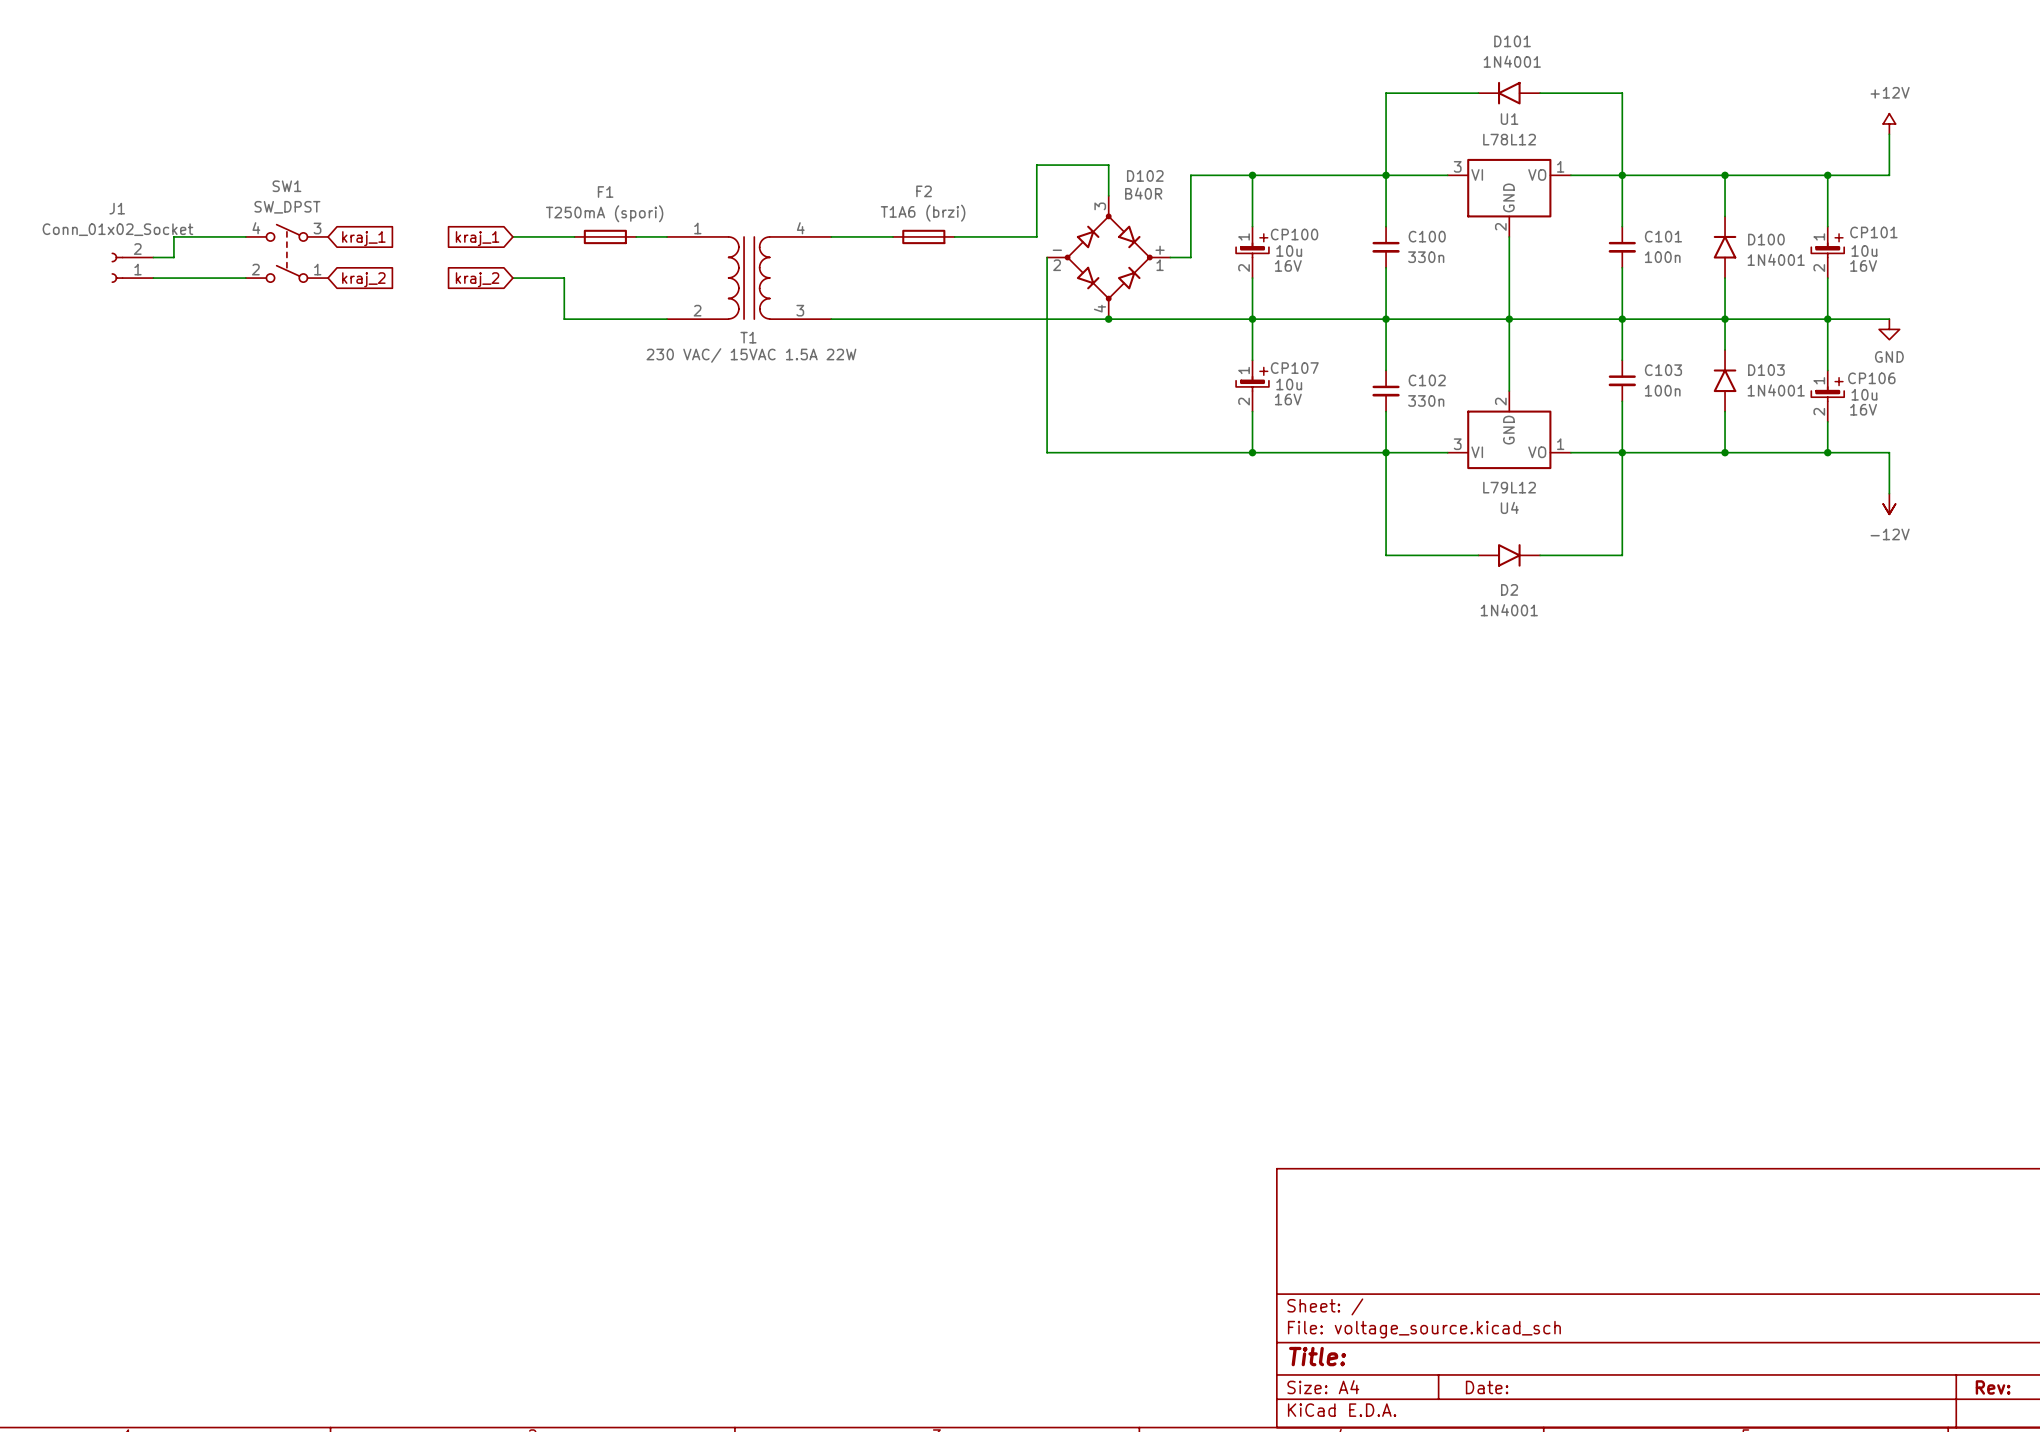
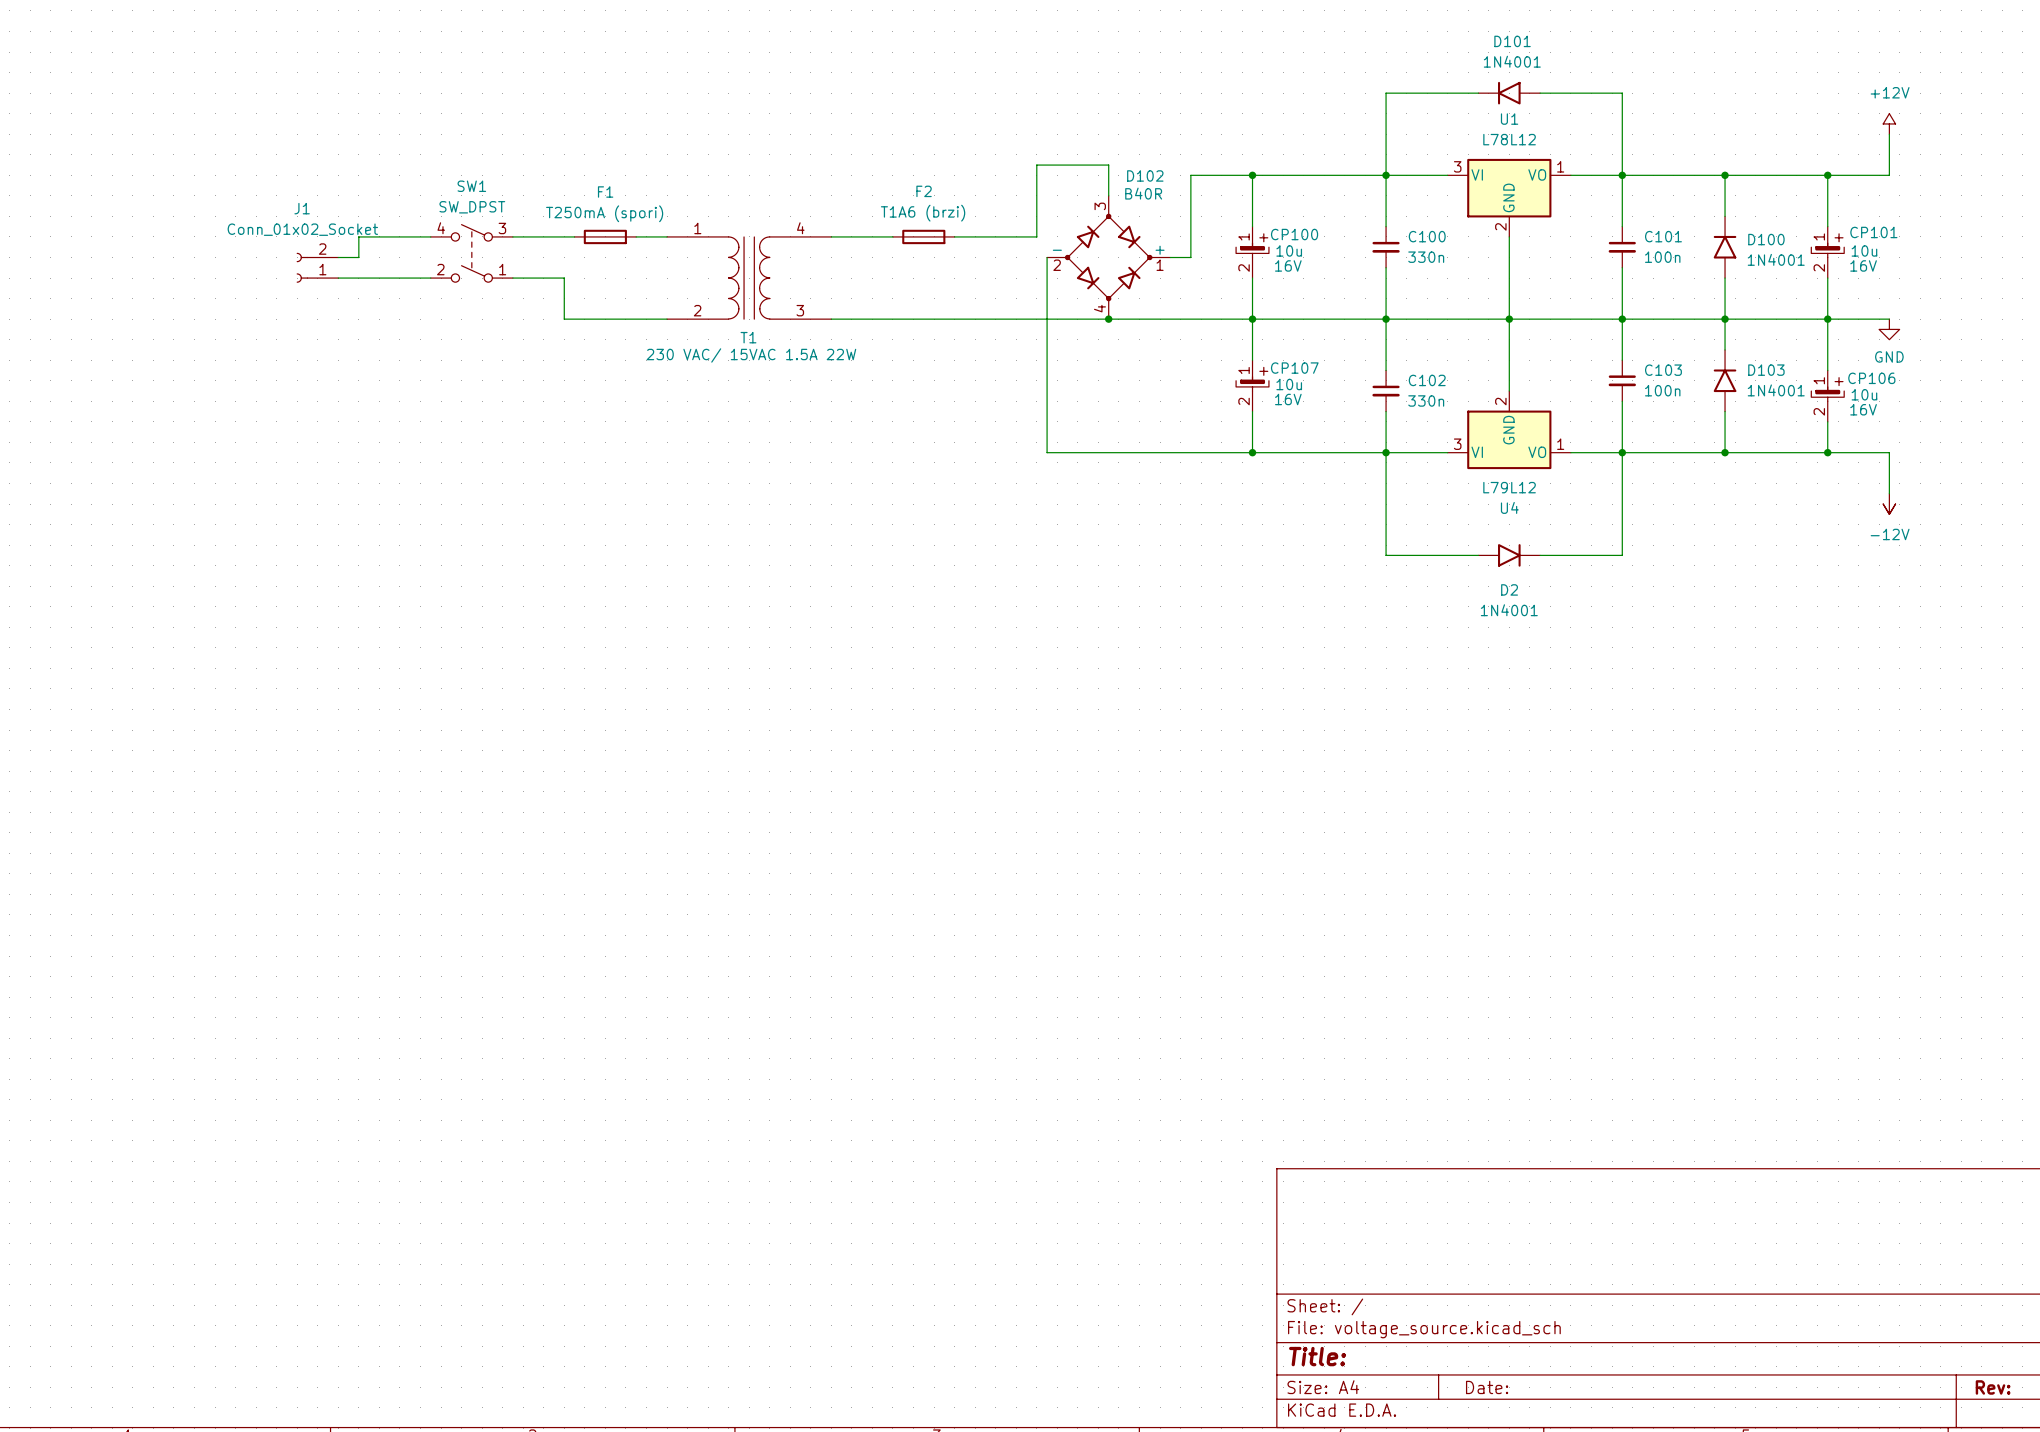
wire: (245, 236) (173, 236) (173, 257) (153, 257) -> (430, 236) (358, 236) (358, 257) (338, 257)
global label: kraj_1 (363, 238) -> none
global label: kraj_1 (477, 238) -> none
SW1 position: (286, 253) -> (471, 253)
J1 position: (132, 267) -> (317, 267)
wire: (153, 278) (245, 278) -> (338, 278) (430, 278)
global label: kraj_2 (363, 279) -> none
global label: kraj_2 (477, 279) -> none

